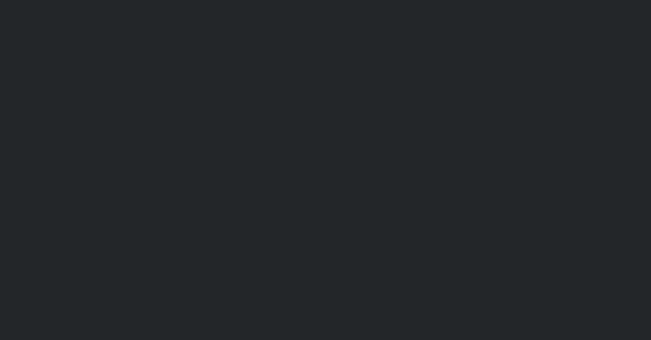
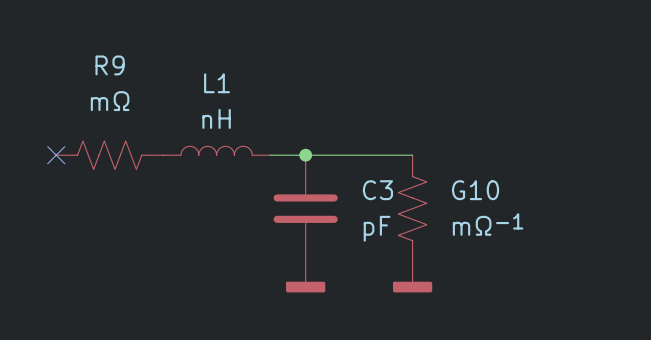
L1: none -> nH (216, 150)
no-connect mark: none -> (56, 155)
R9: none -> mΩ (109, 155)
wire: none -> (270, 155) (412, 155)
junction: none -> (305, 155)
C3: none -> pF (305, 208)
G10: none -> mΩ-1 (412, 208)
power symbol: none -> (305, 277)
power symbol: none -> (412, 277)

